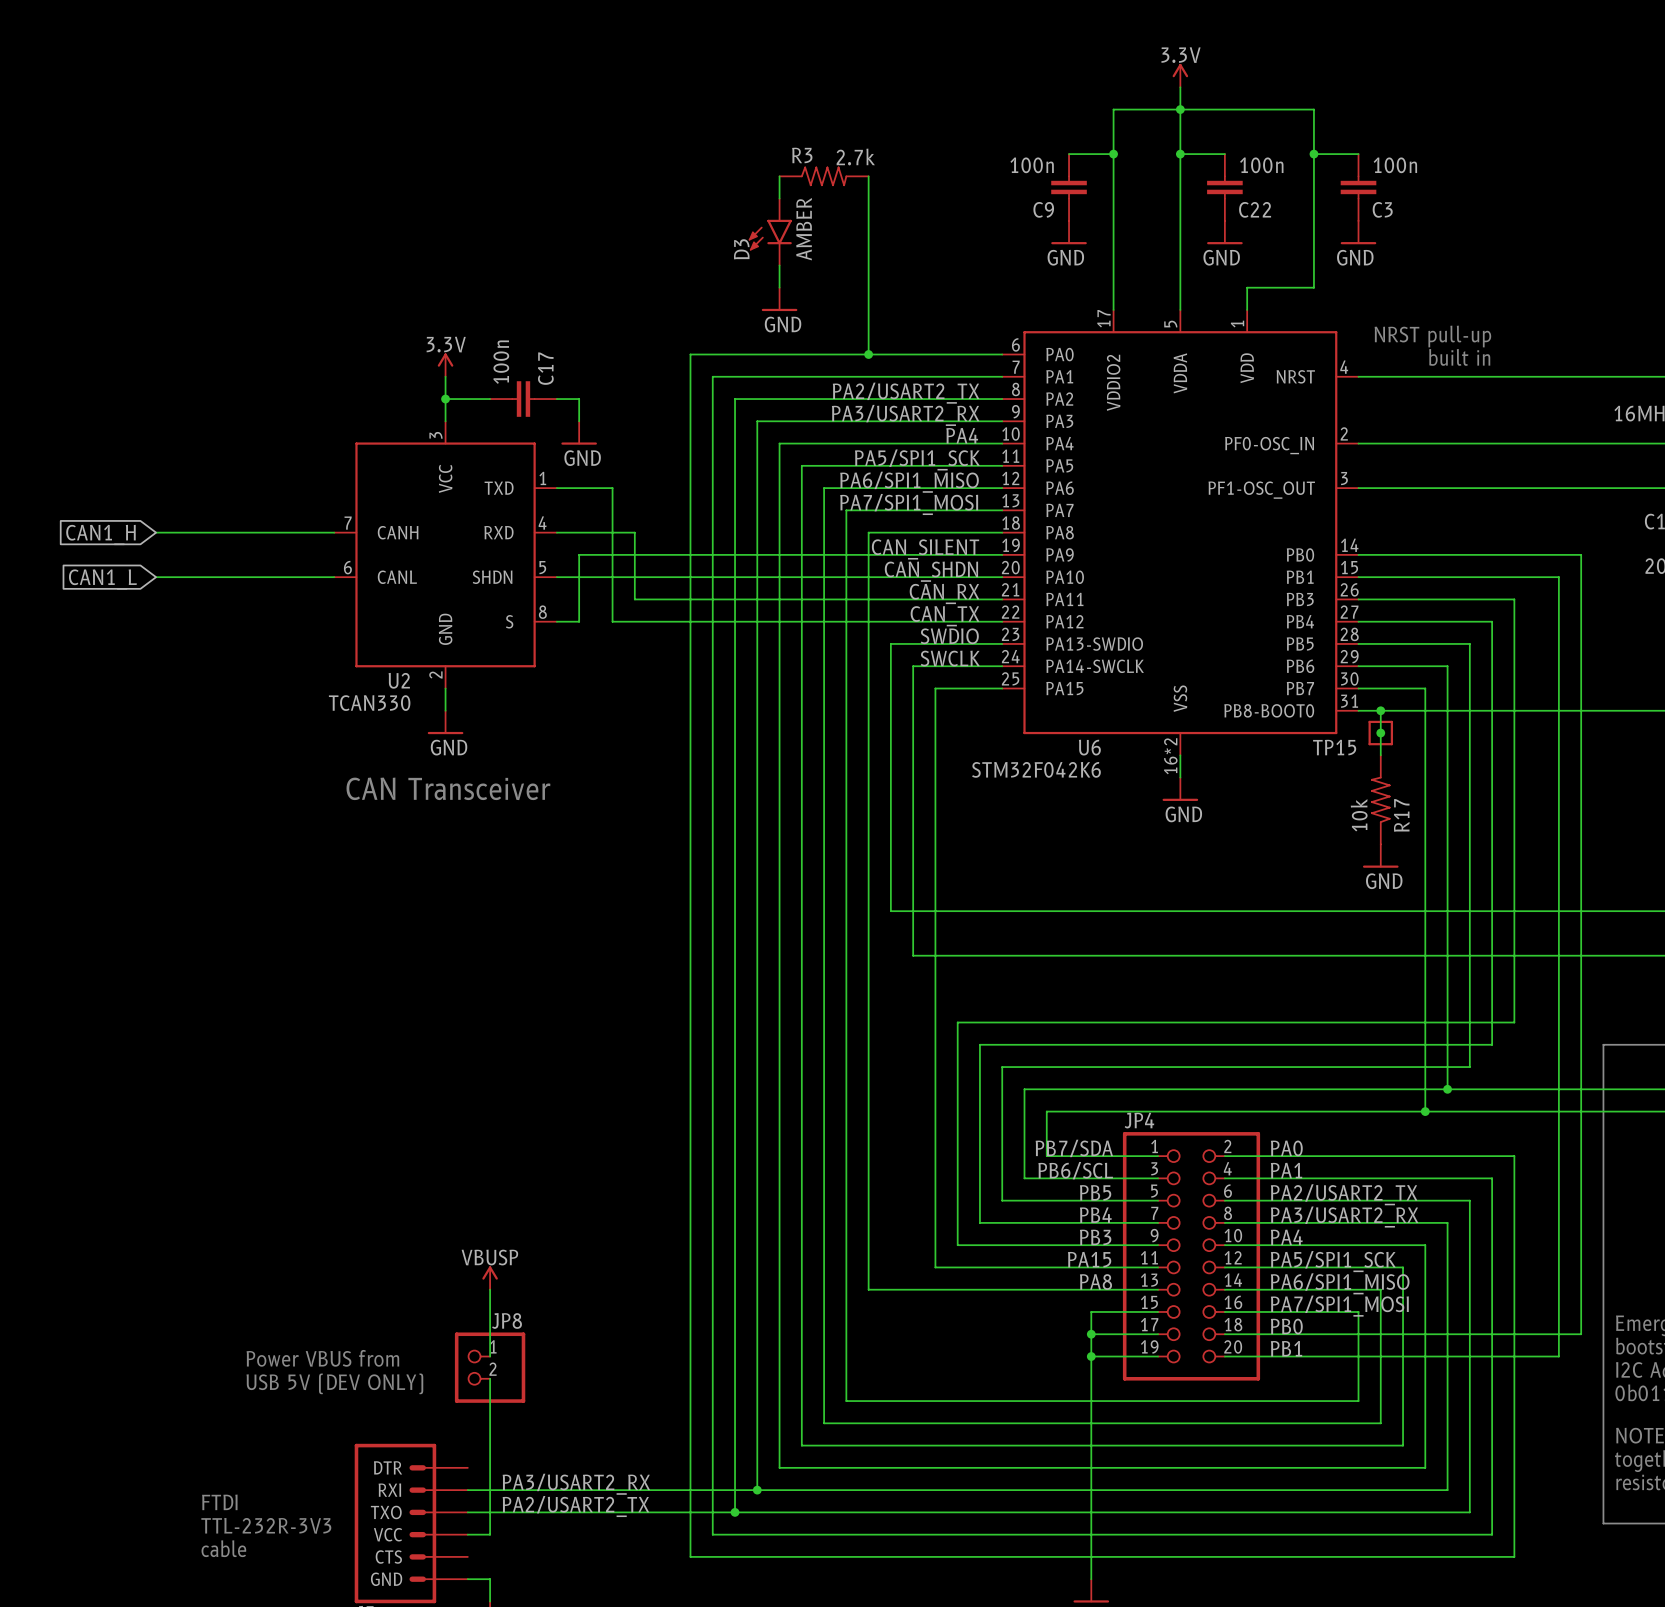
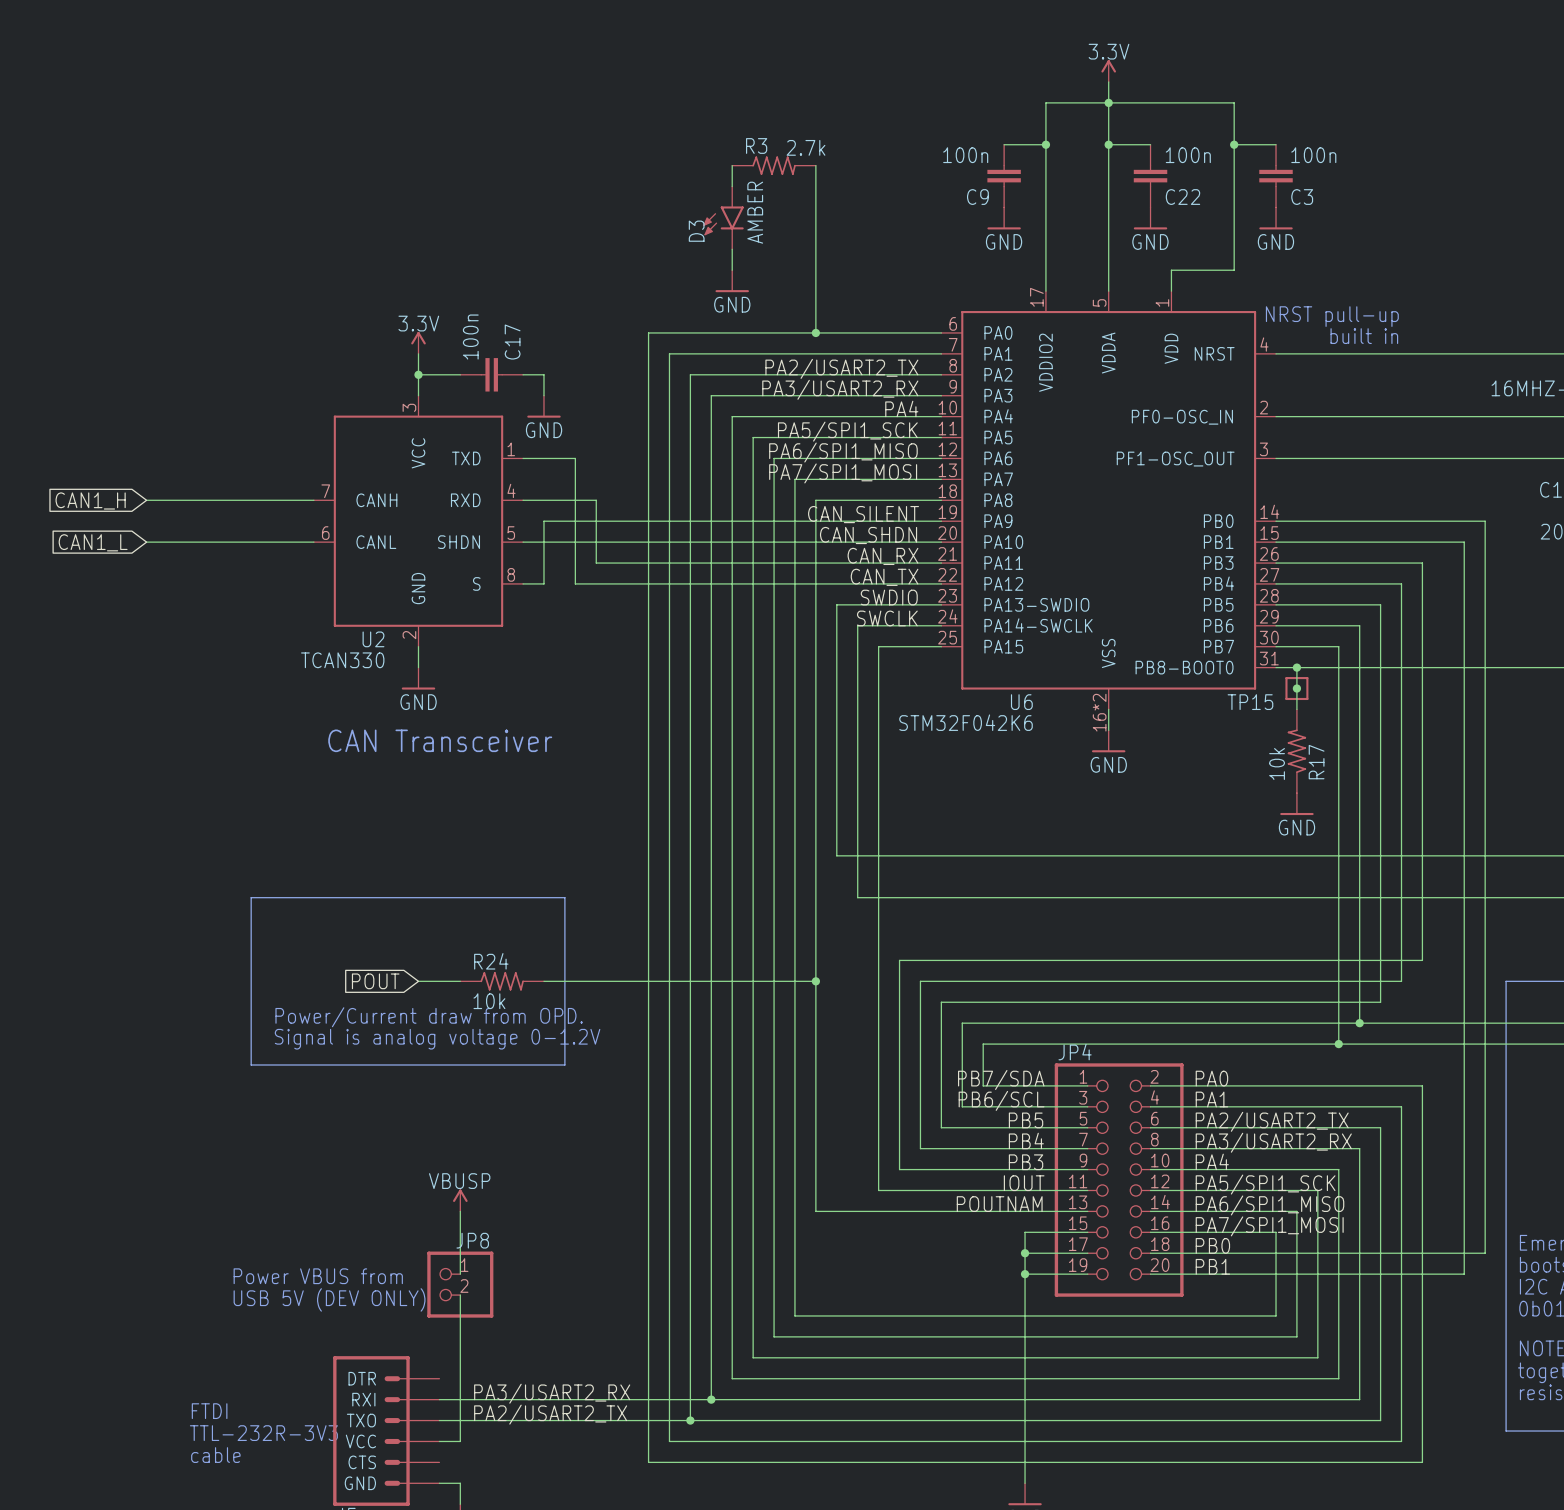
line: none -> (251, 897) (251, 1064) (564, 1064) (564, 897) (251, 897)
global label: none -> POUT (375, 981)
wire: none -> (418, 981) (460, 981)
R24: none -> 10k (502, 981)
wire: none -> (543, 981) (815, 981)
junction: none -> (815, 981)
text: none -> Power/Current draw from OPD. (429, 1017)
text: none -> Signal is analog voltage 0-1.2V (437, 1039)
label: PA15 (1089, 1259) -> IOUT (1024, 1183)
label: PA8 (1095, 1282) -> POUTNAM (999, 1204)

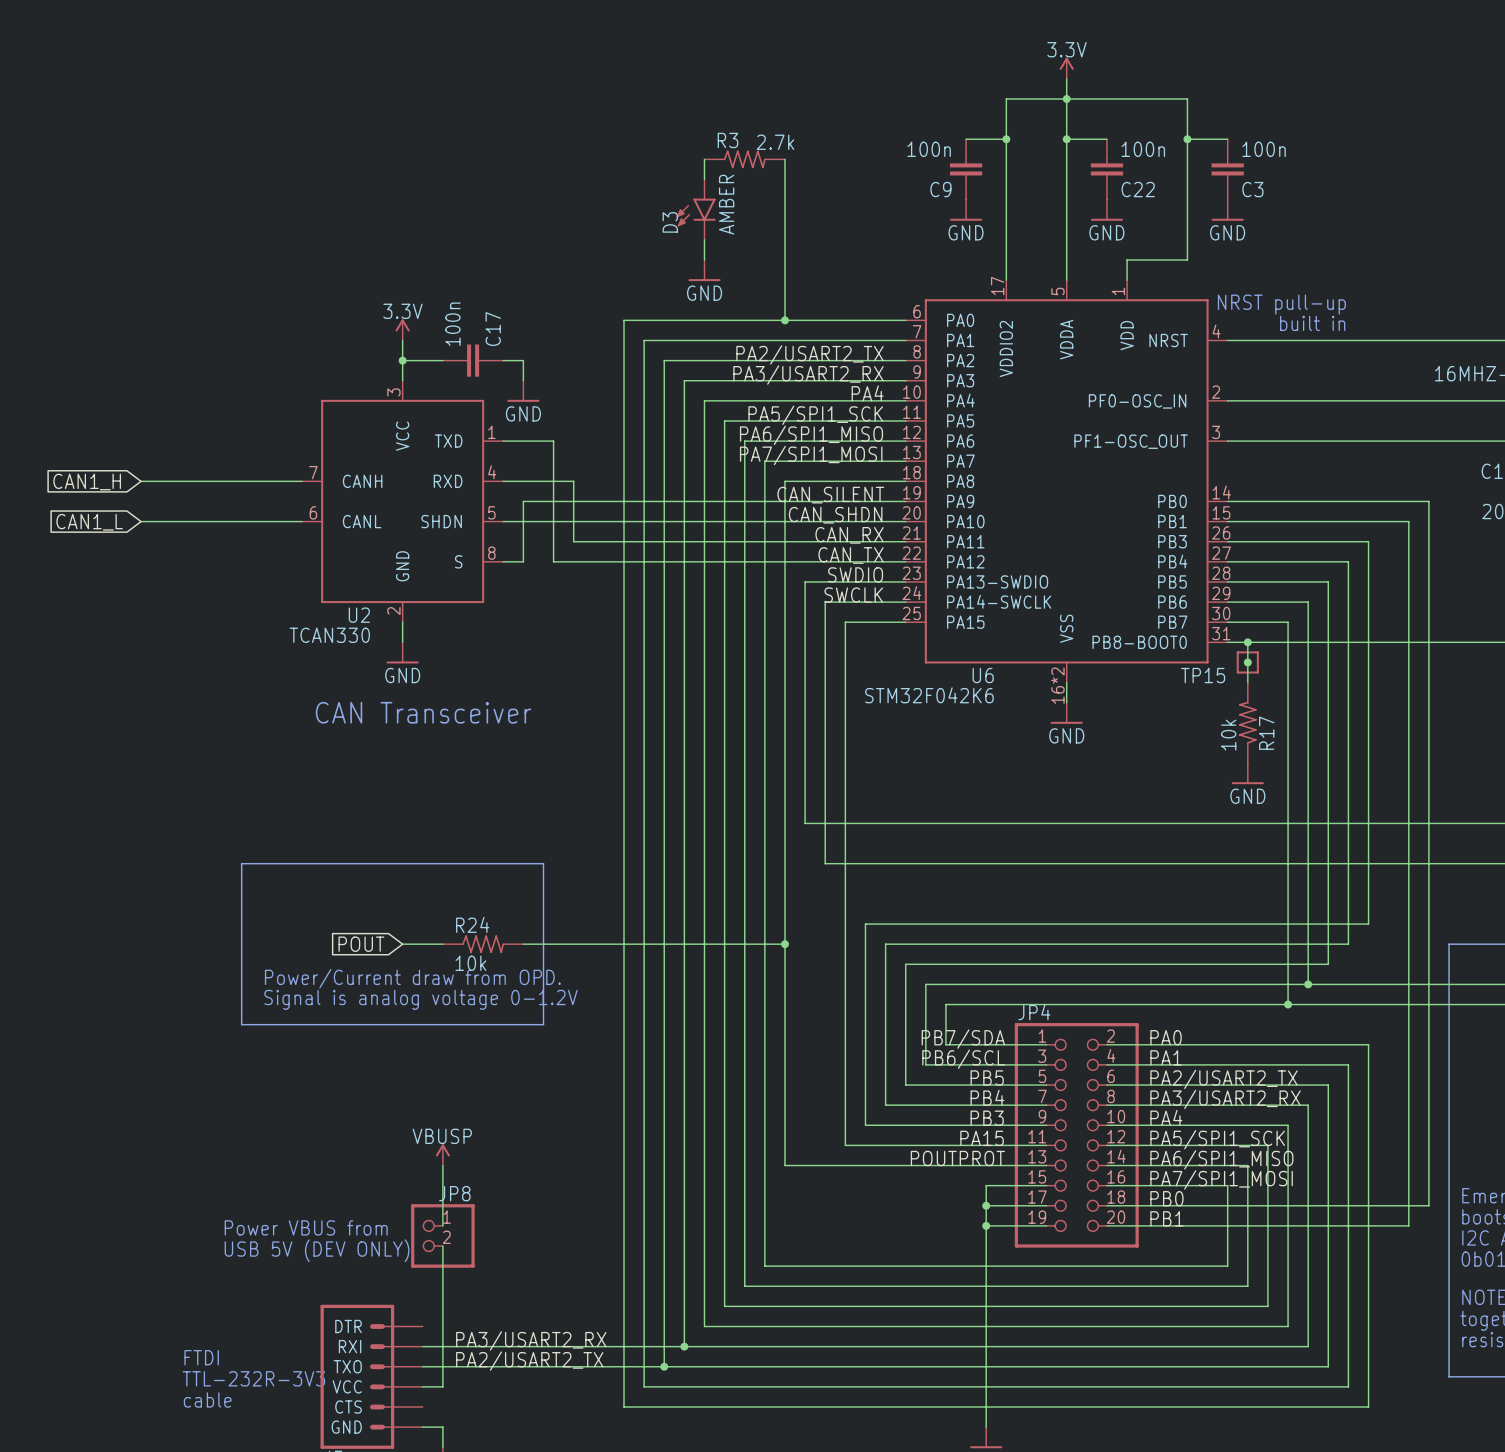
label: IOUT (1024, 1183) -> PA15 (982, 1138)
label: POUTNAM (999, 1204) -> POUTPROT (957, 1158)

